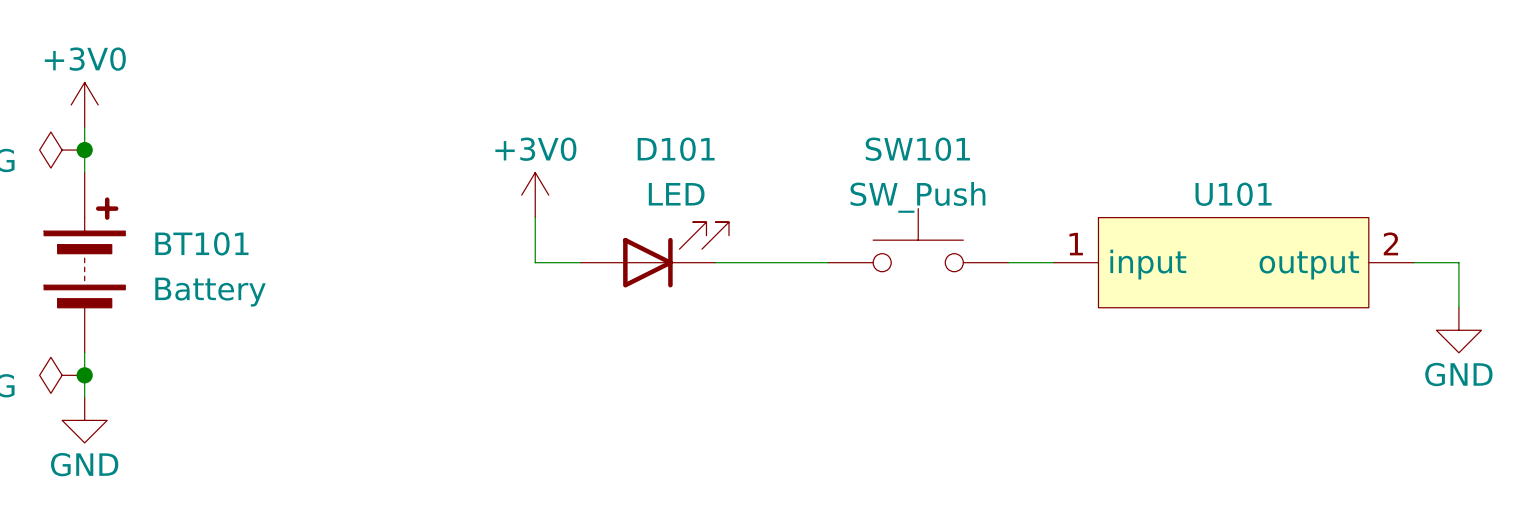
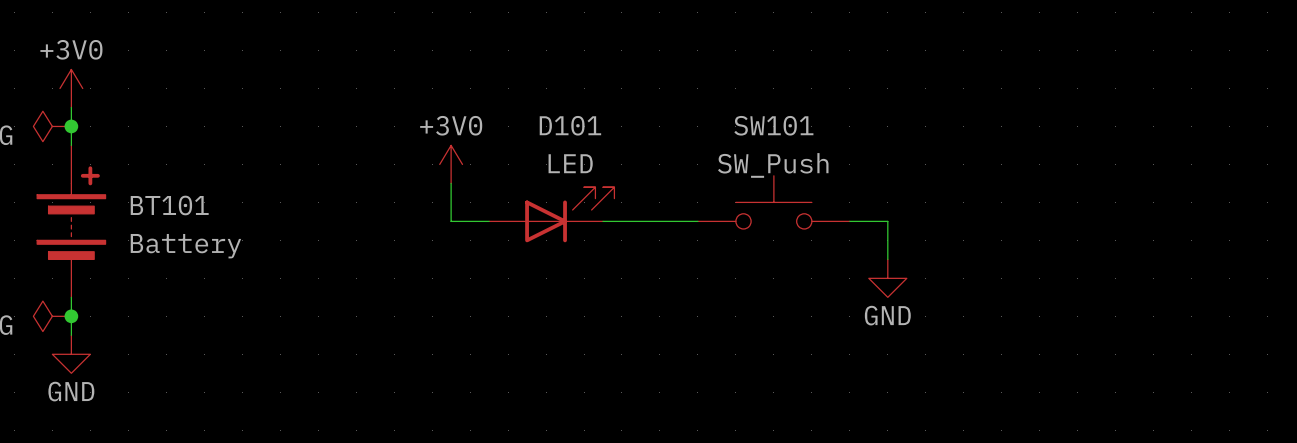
wire: none -> (887, 221) (887, 259)
U101: (1233, 262) -> none
wire: (1413, 262) (1458, 262) (1458, 307) -> none
power symbol position: GND (1458, 330) -> GND (887, 278)

